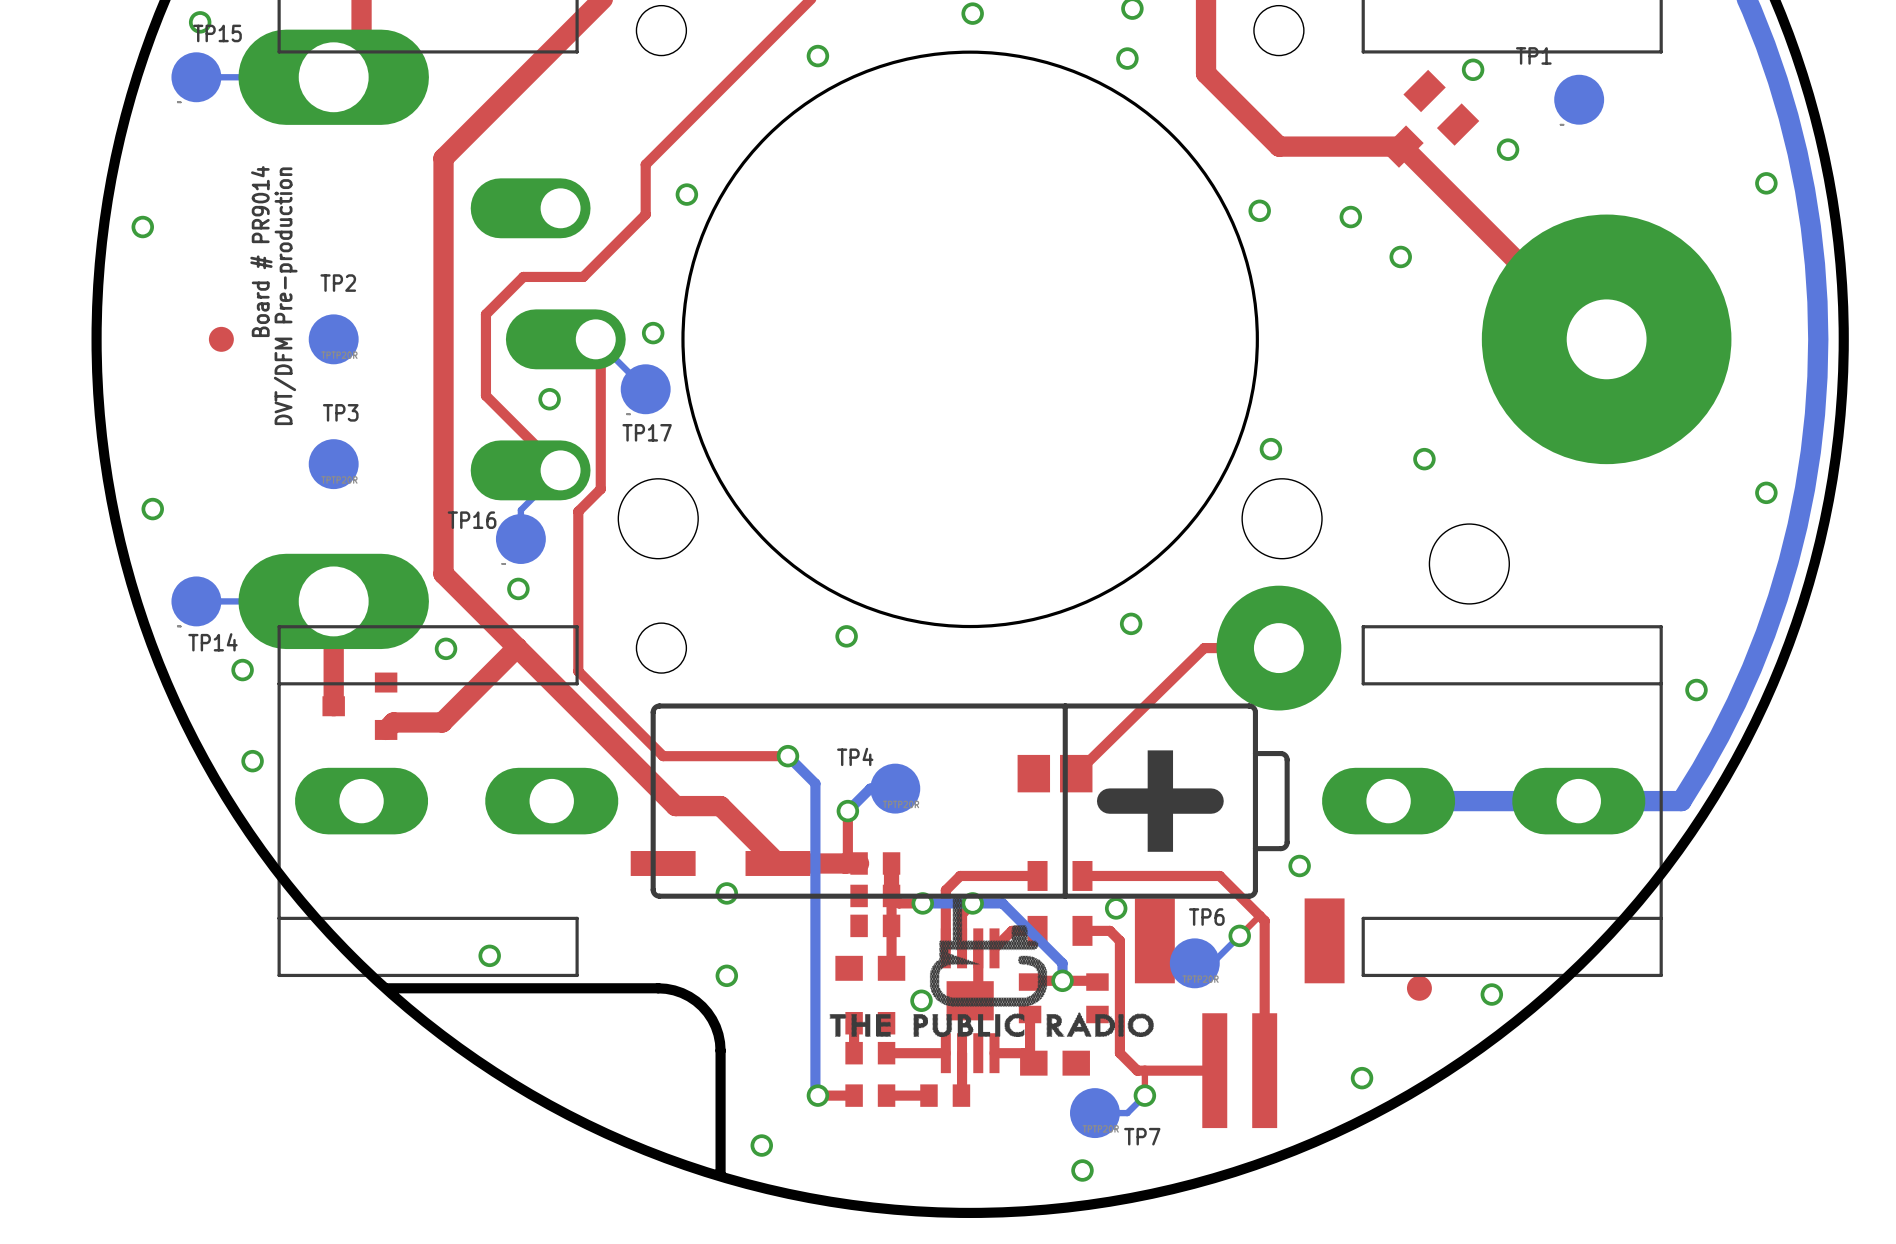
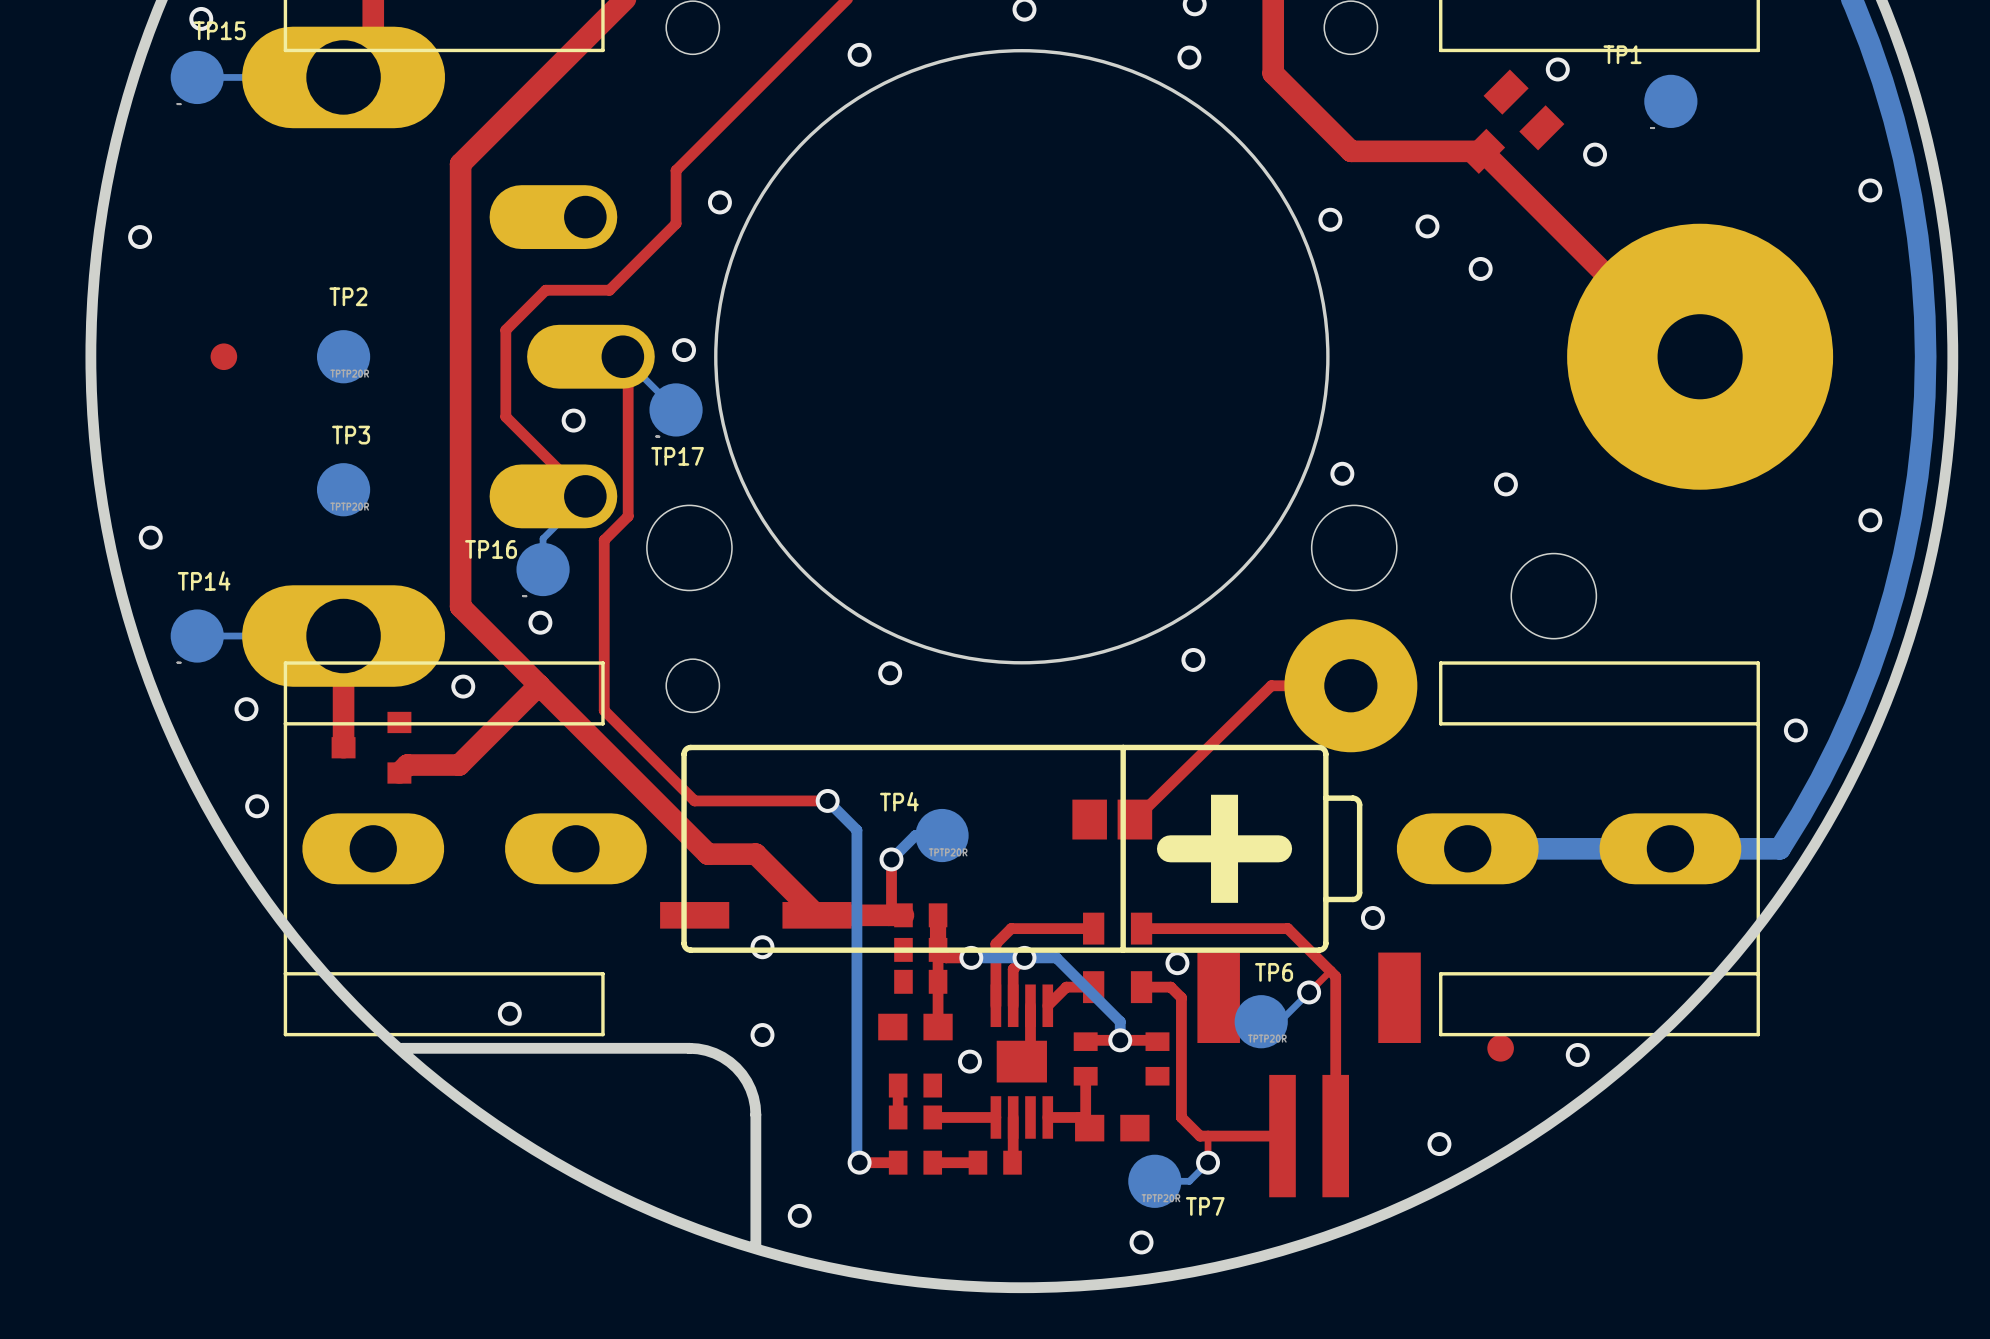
text: Board # PR9014 (261, 251) -> none
text: DVT/DFM Pre-production (285, 296) -> none
TP14 name position: TP14 (212, 642) -> TP14 (204, 580)
drawing: [829, 896, 1154, 1038] -> none

